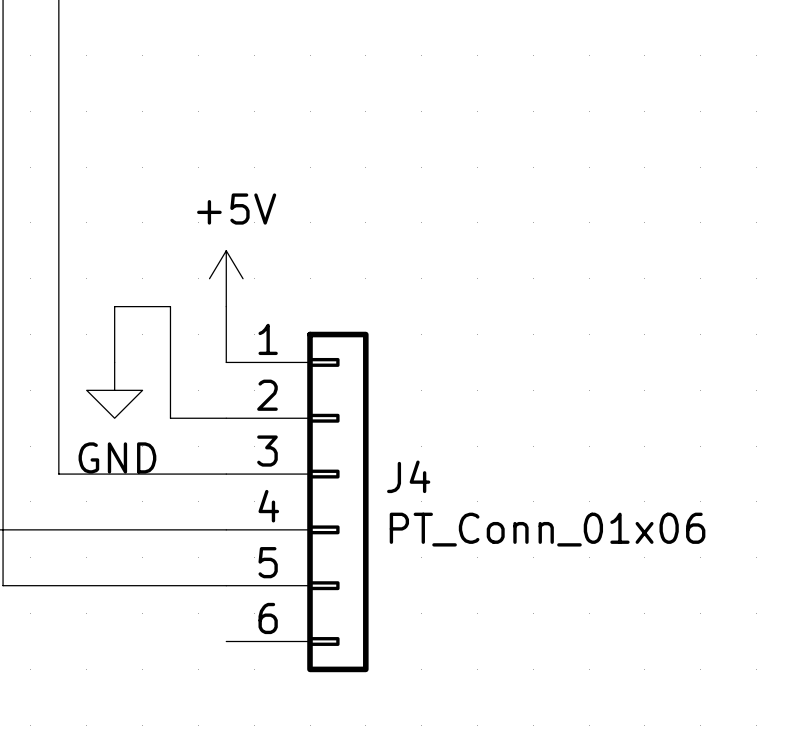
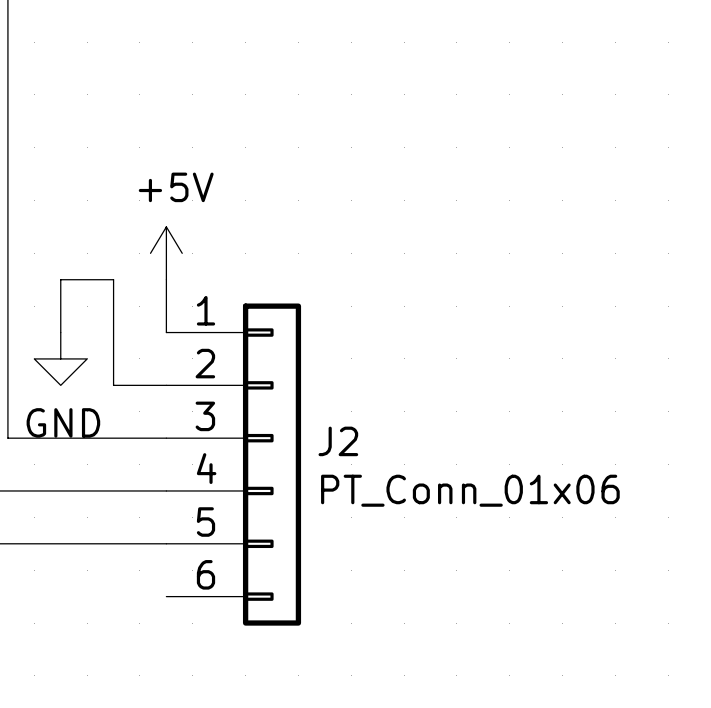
J4 name: J4 (408, 476) -> J2 (338, 441)

